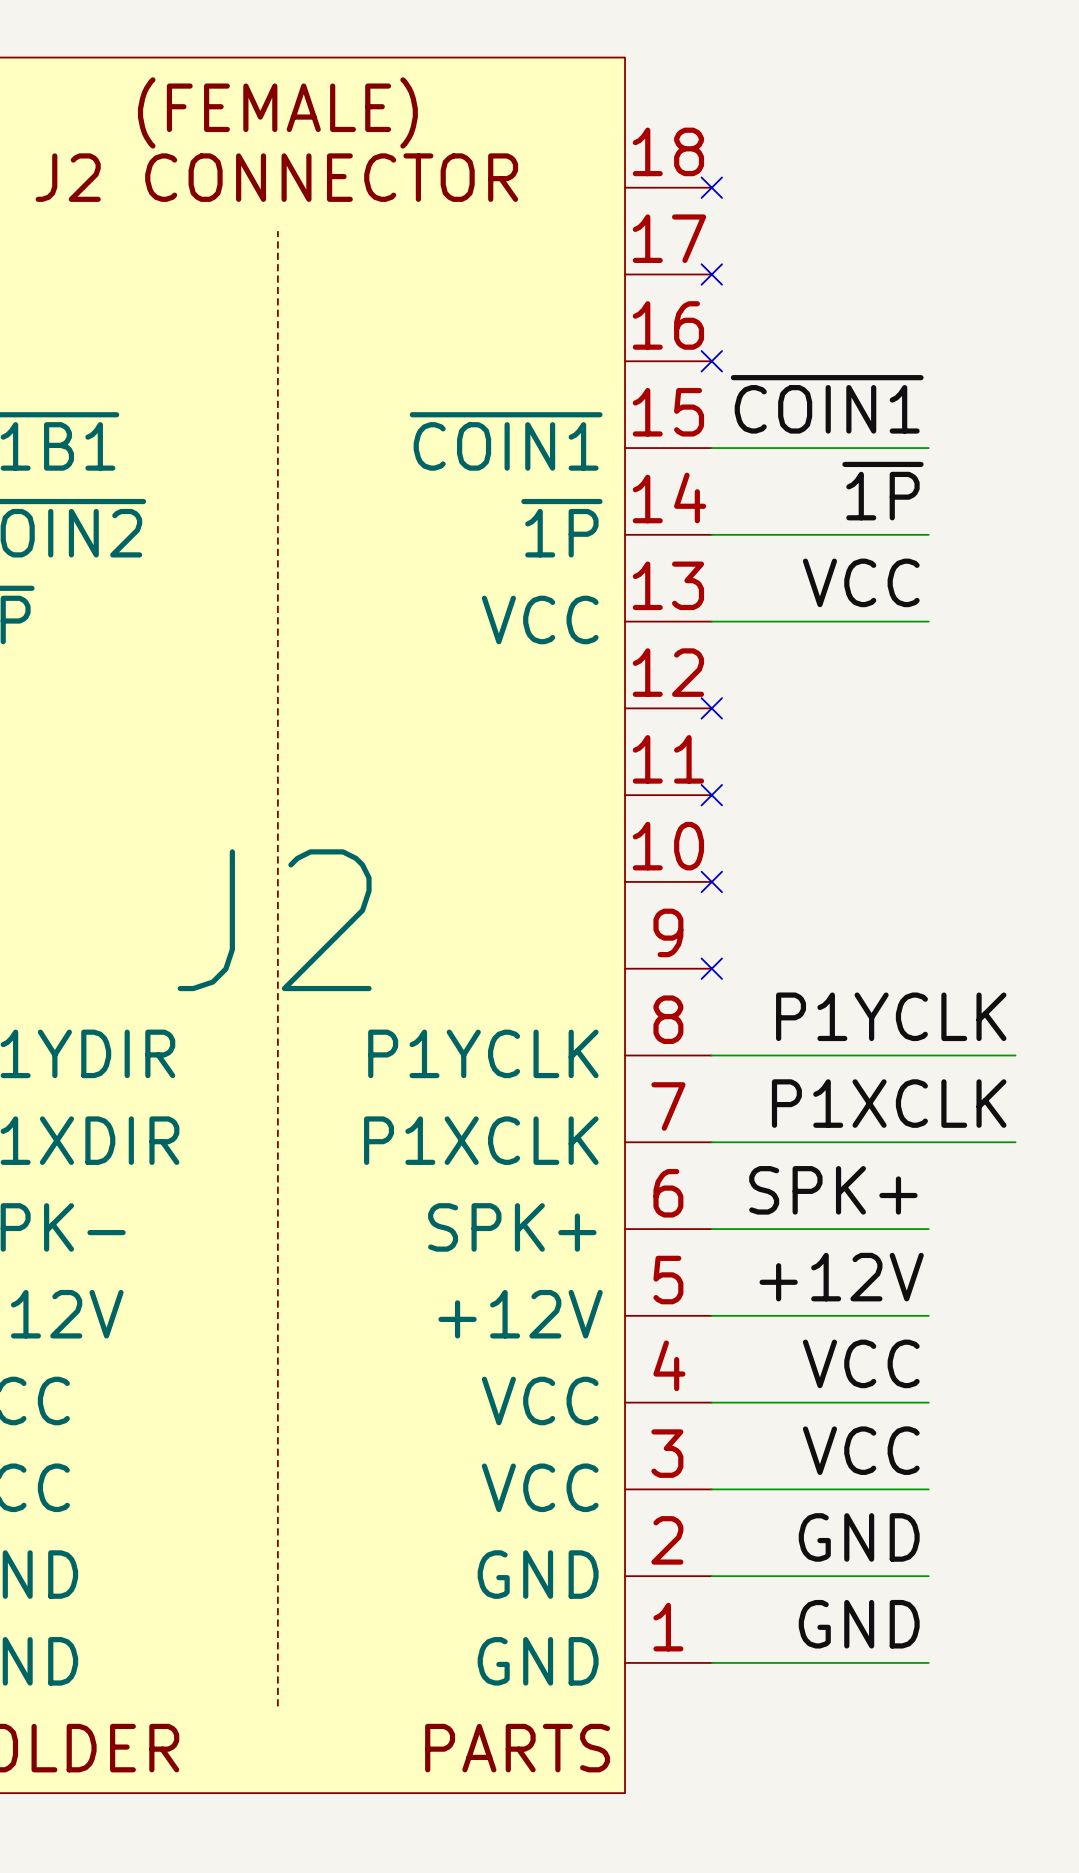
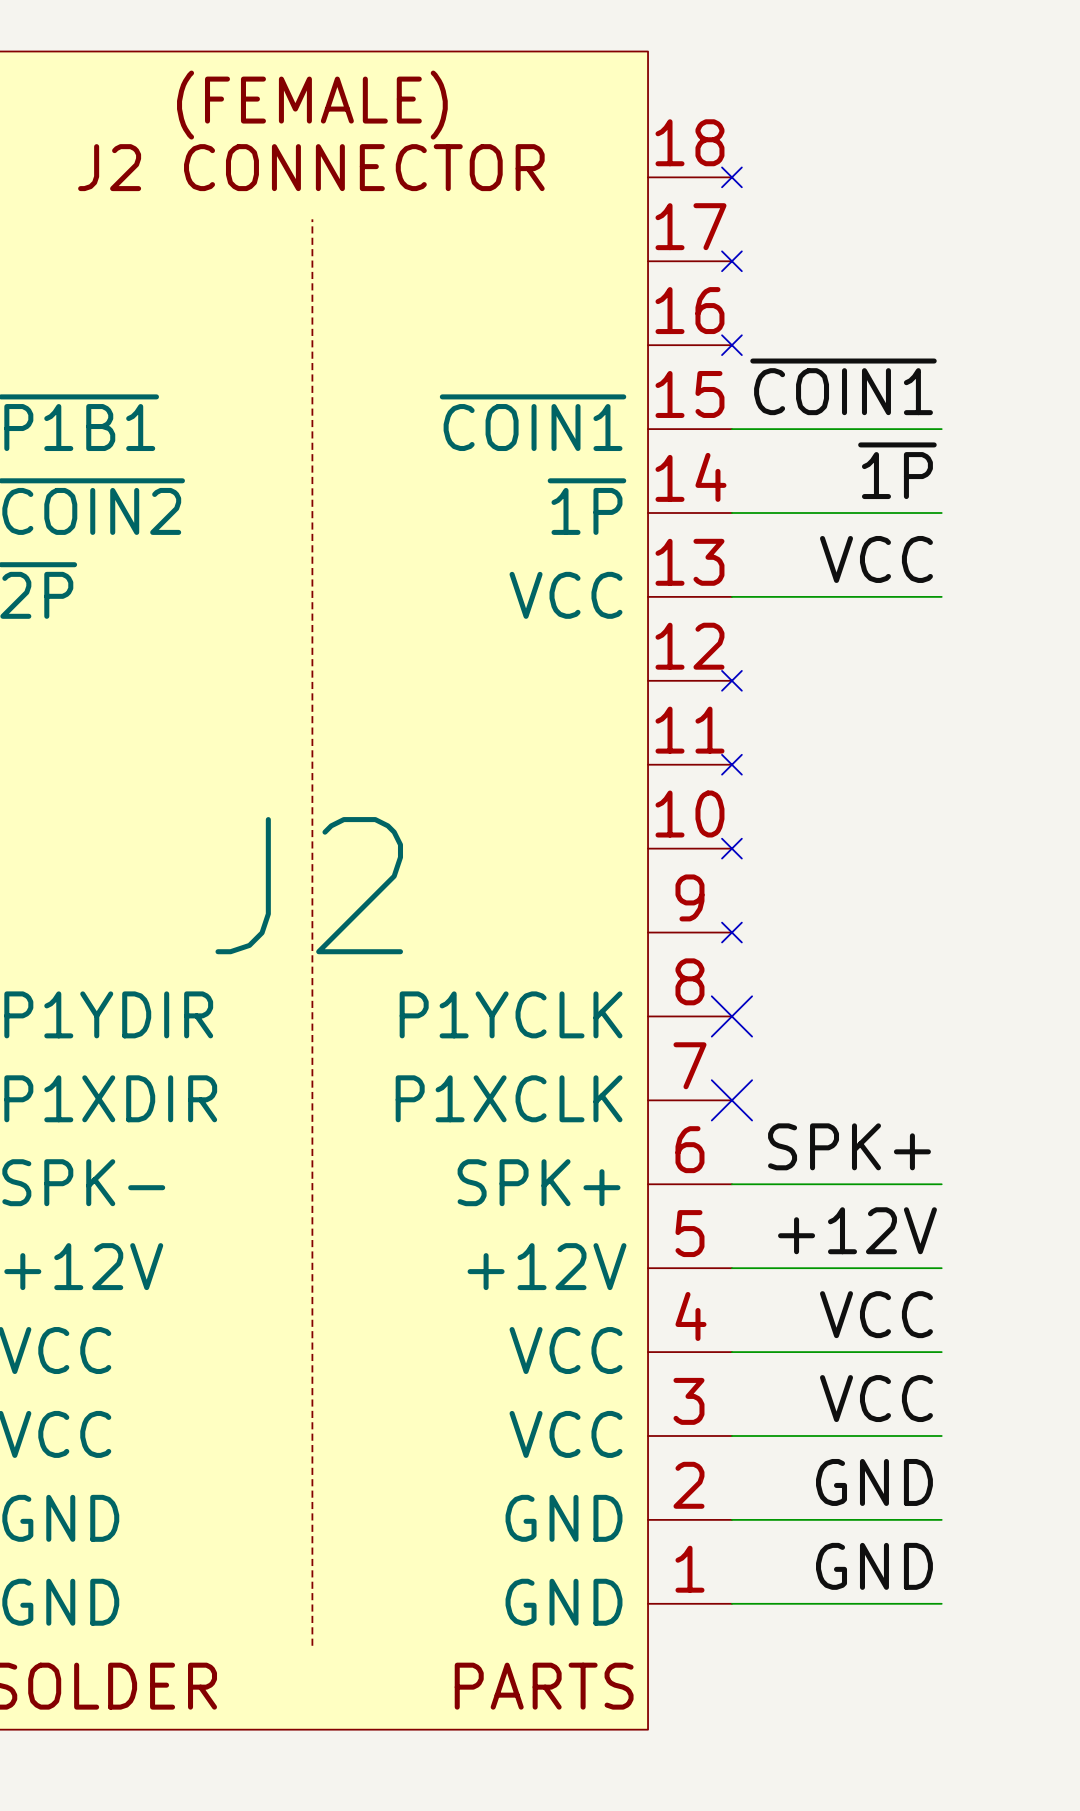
label: P1YCLK (891, 1016) -> none
wire: (711, 1055) (1015, 1055) -> none
no-connect mark: none -> (731, 1016)
label: P1XCLK (889, 1103) -> none
wire: (711, 1142) (1015, 1142) -> none
no-connect mark: none -> (731, 1100)

